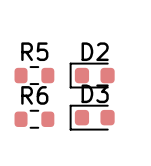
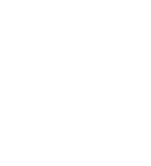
R5: (34, 75) -> none
D2: (92, 75) -> none
D3: (92, 117) -> none
R6: (34, 119) -> none

